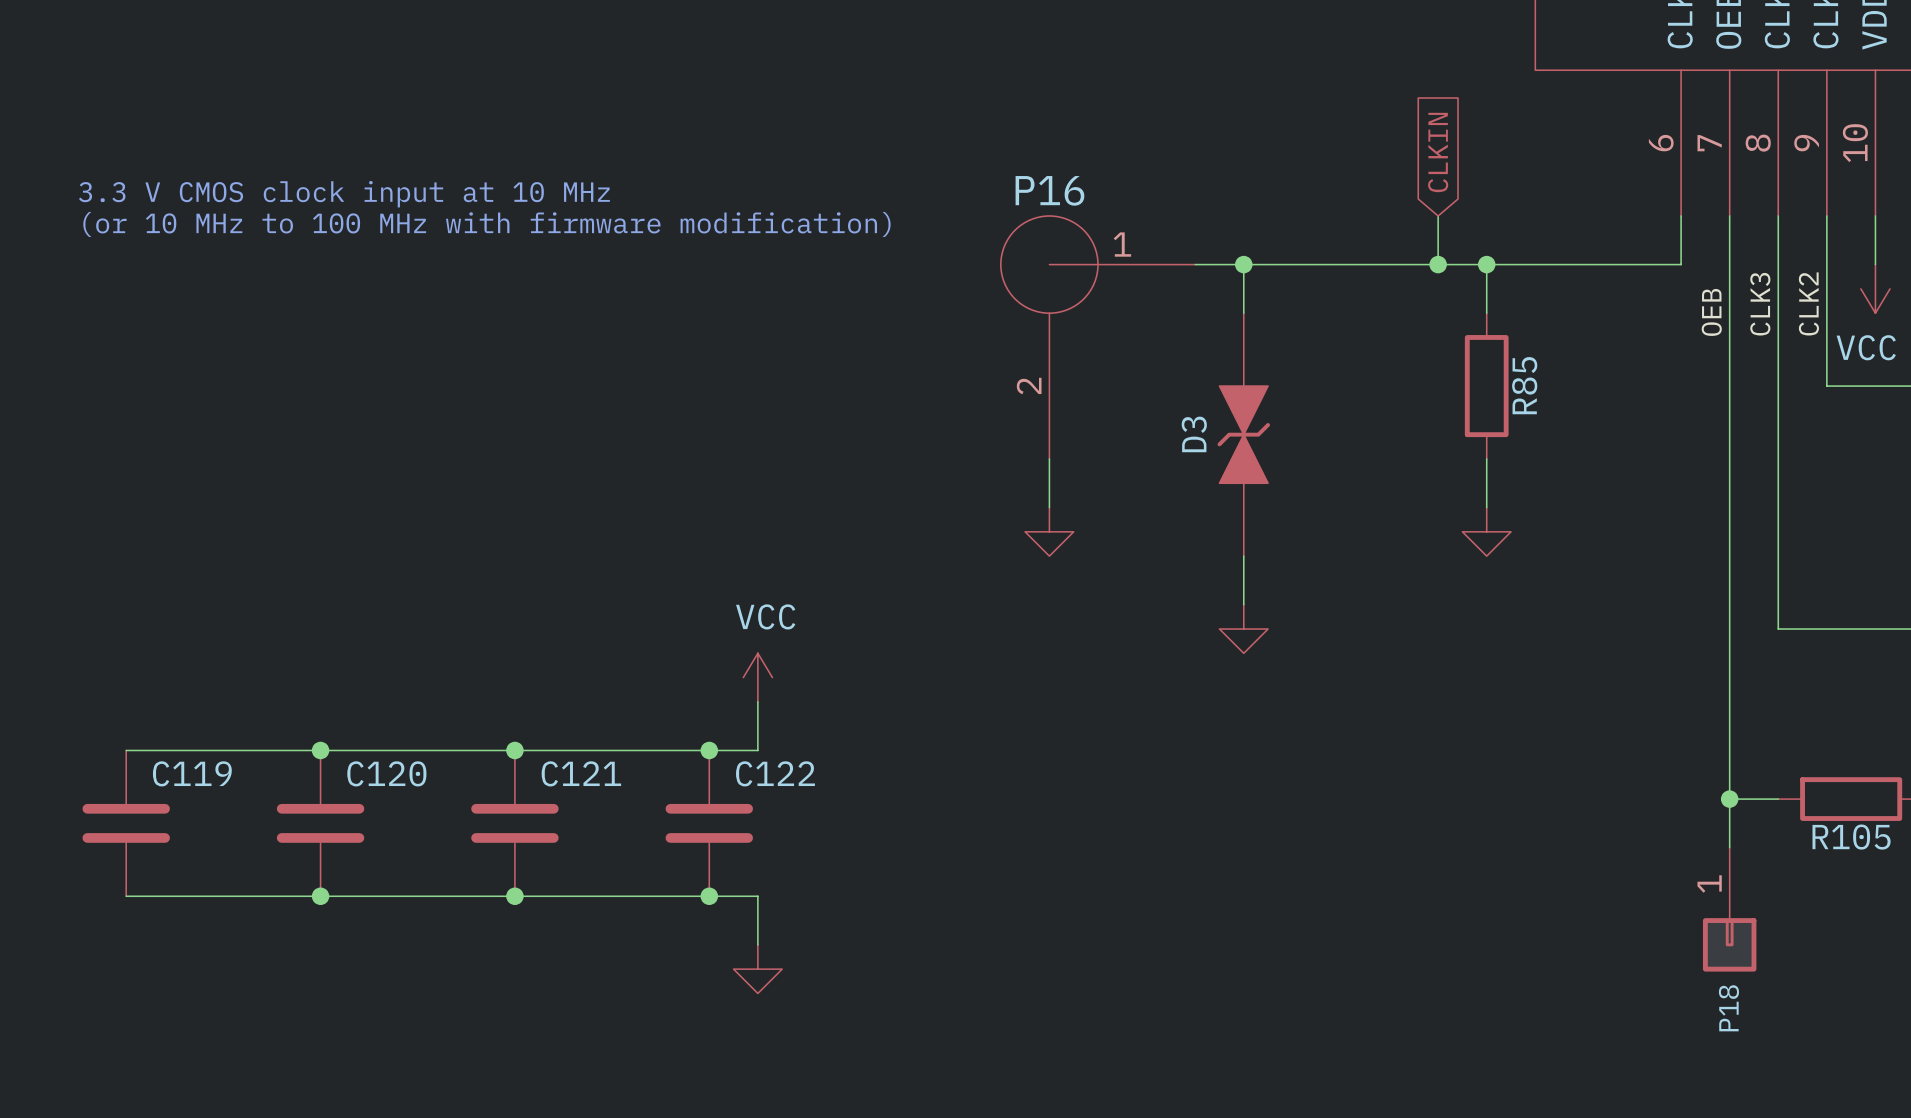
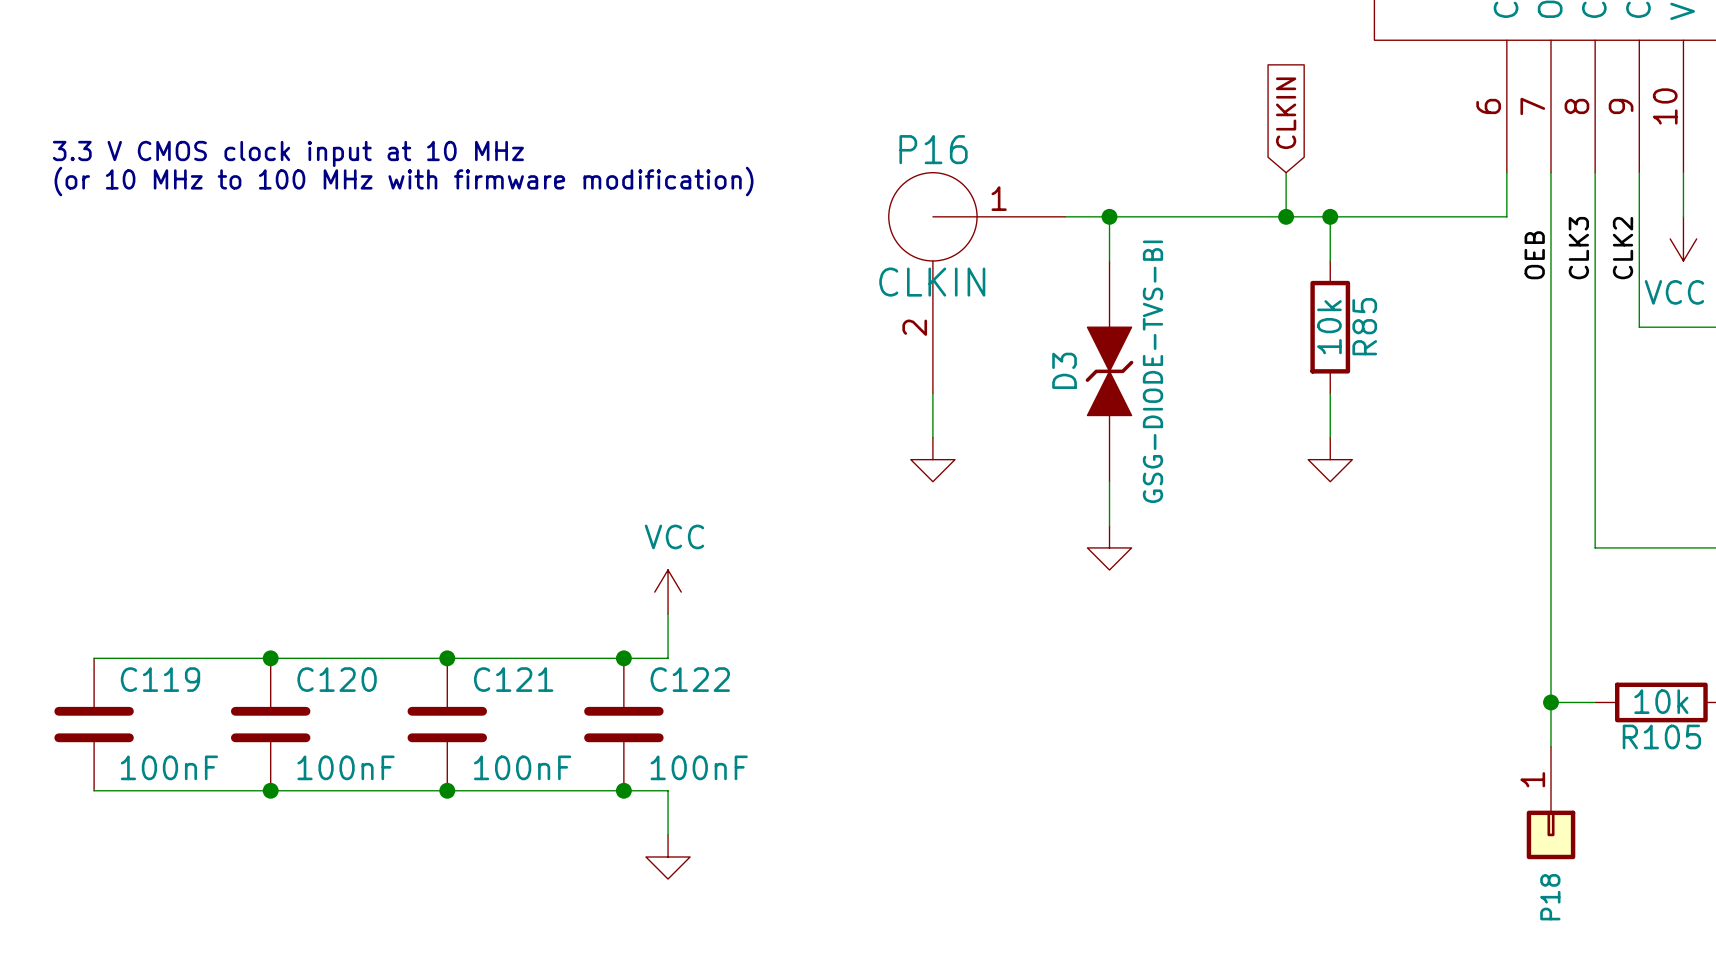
P16 value: none -> CLKIN (932, 282)
R85 value: none -> 10k (1329, 327)
D3 value: none -> GSG-DIODE-TVS-BI (1153, 371)
R105 value: none -> 10k (1661, 701)
C119 value: none -> 100nF (169, 767)
C120 value: none -> 100nF (346, 767)
C121 value: none -> 100nF (522, 767)
C122 value: none -> 100nF (699, 767)

